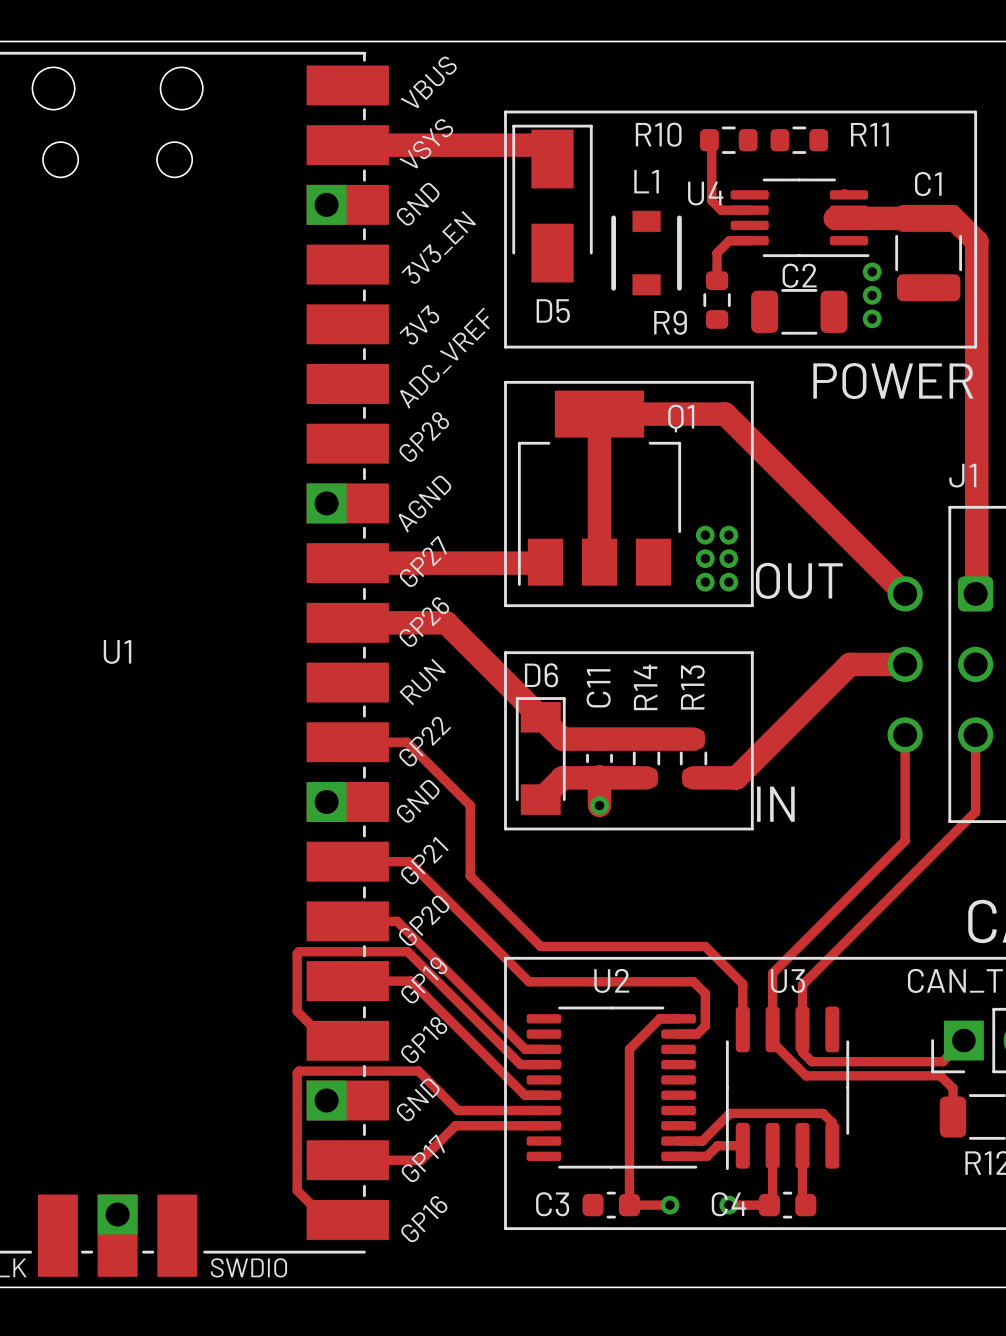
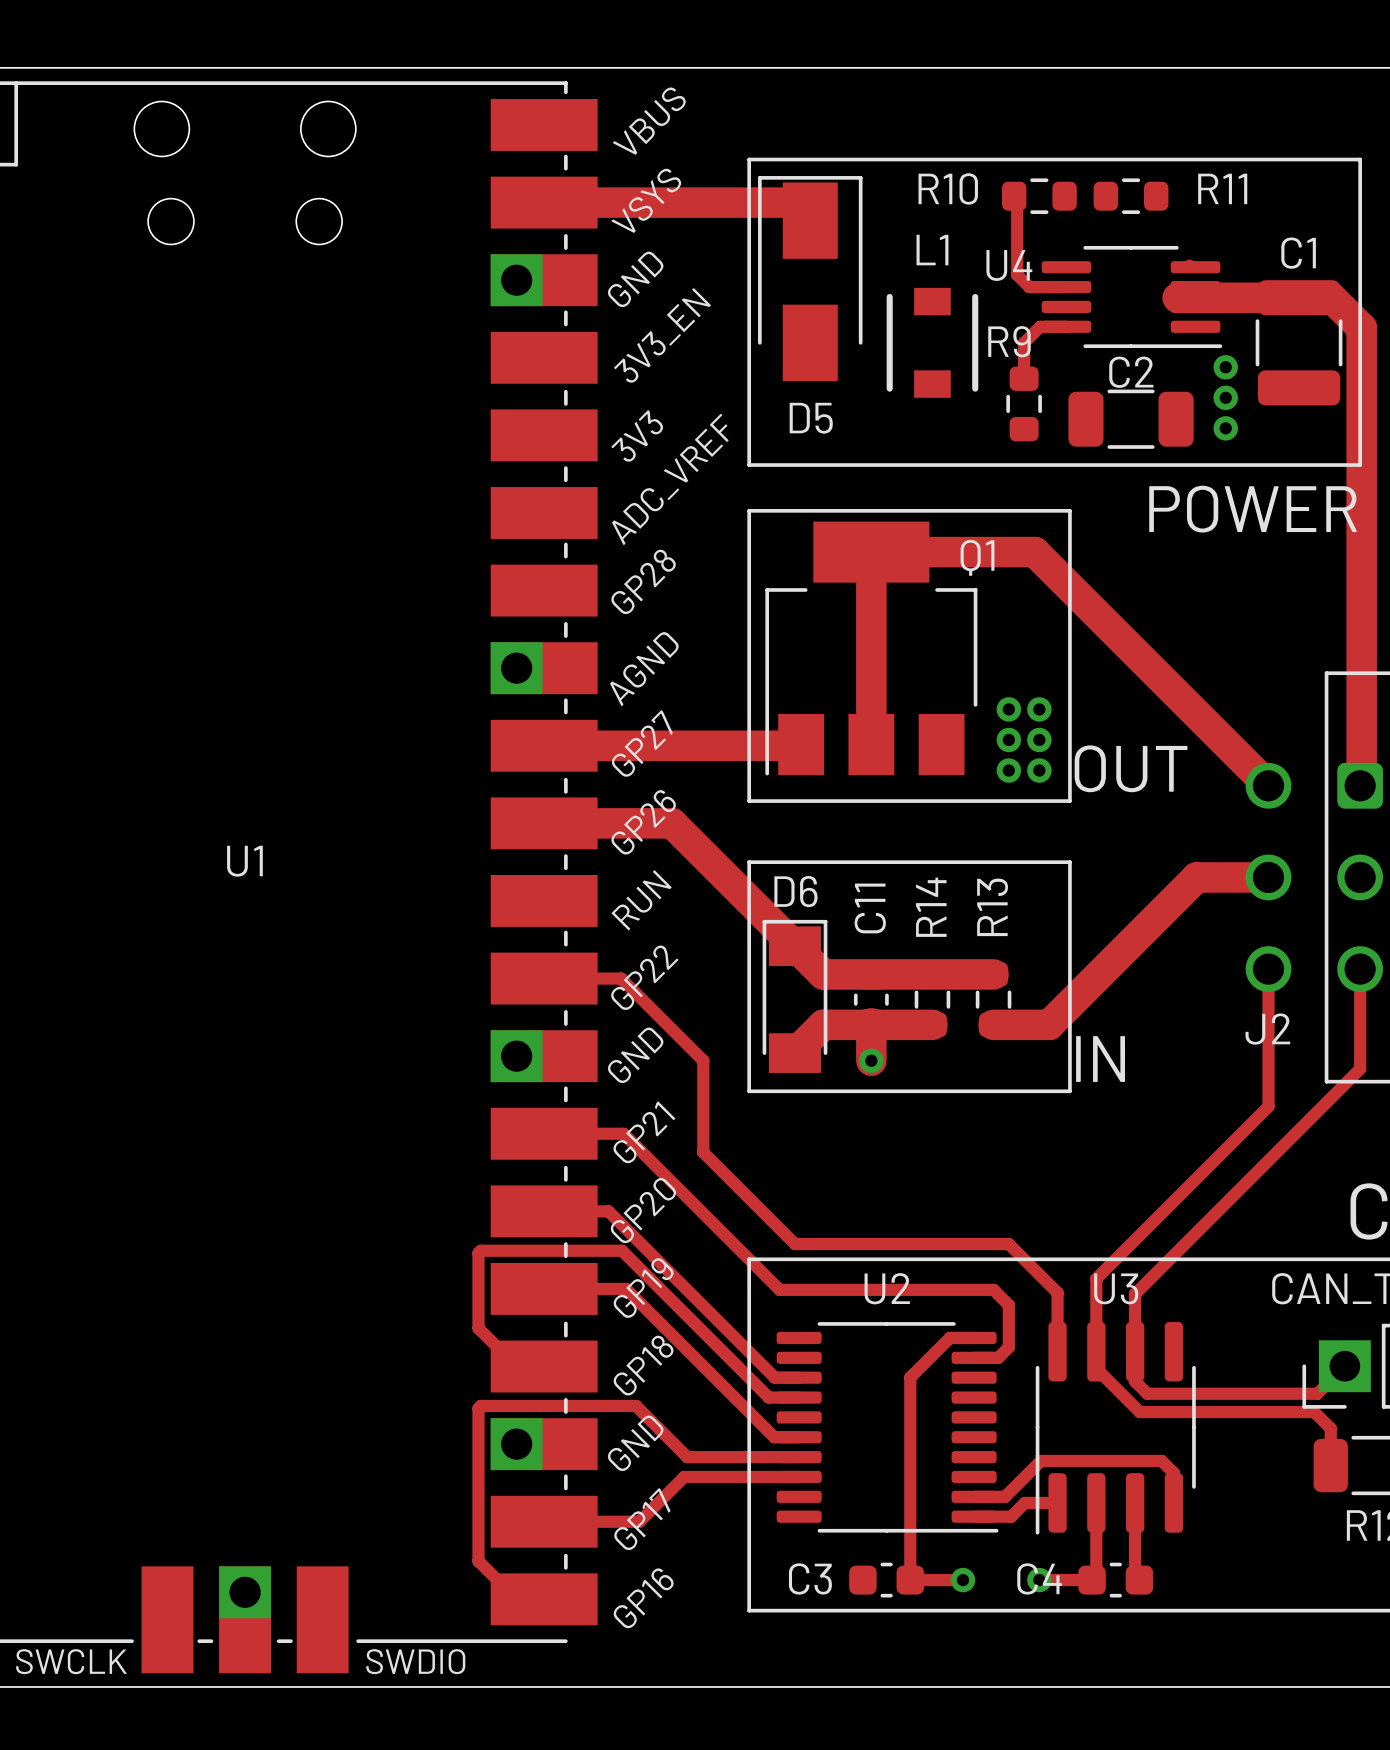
R9 name position: R9 (670, 322) -> R9 (1009, 341)
J1 name: J1 (962, 475) -> J2 (1267, 1029)

